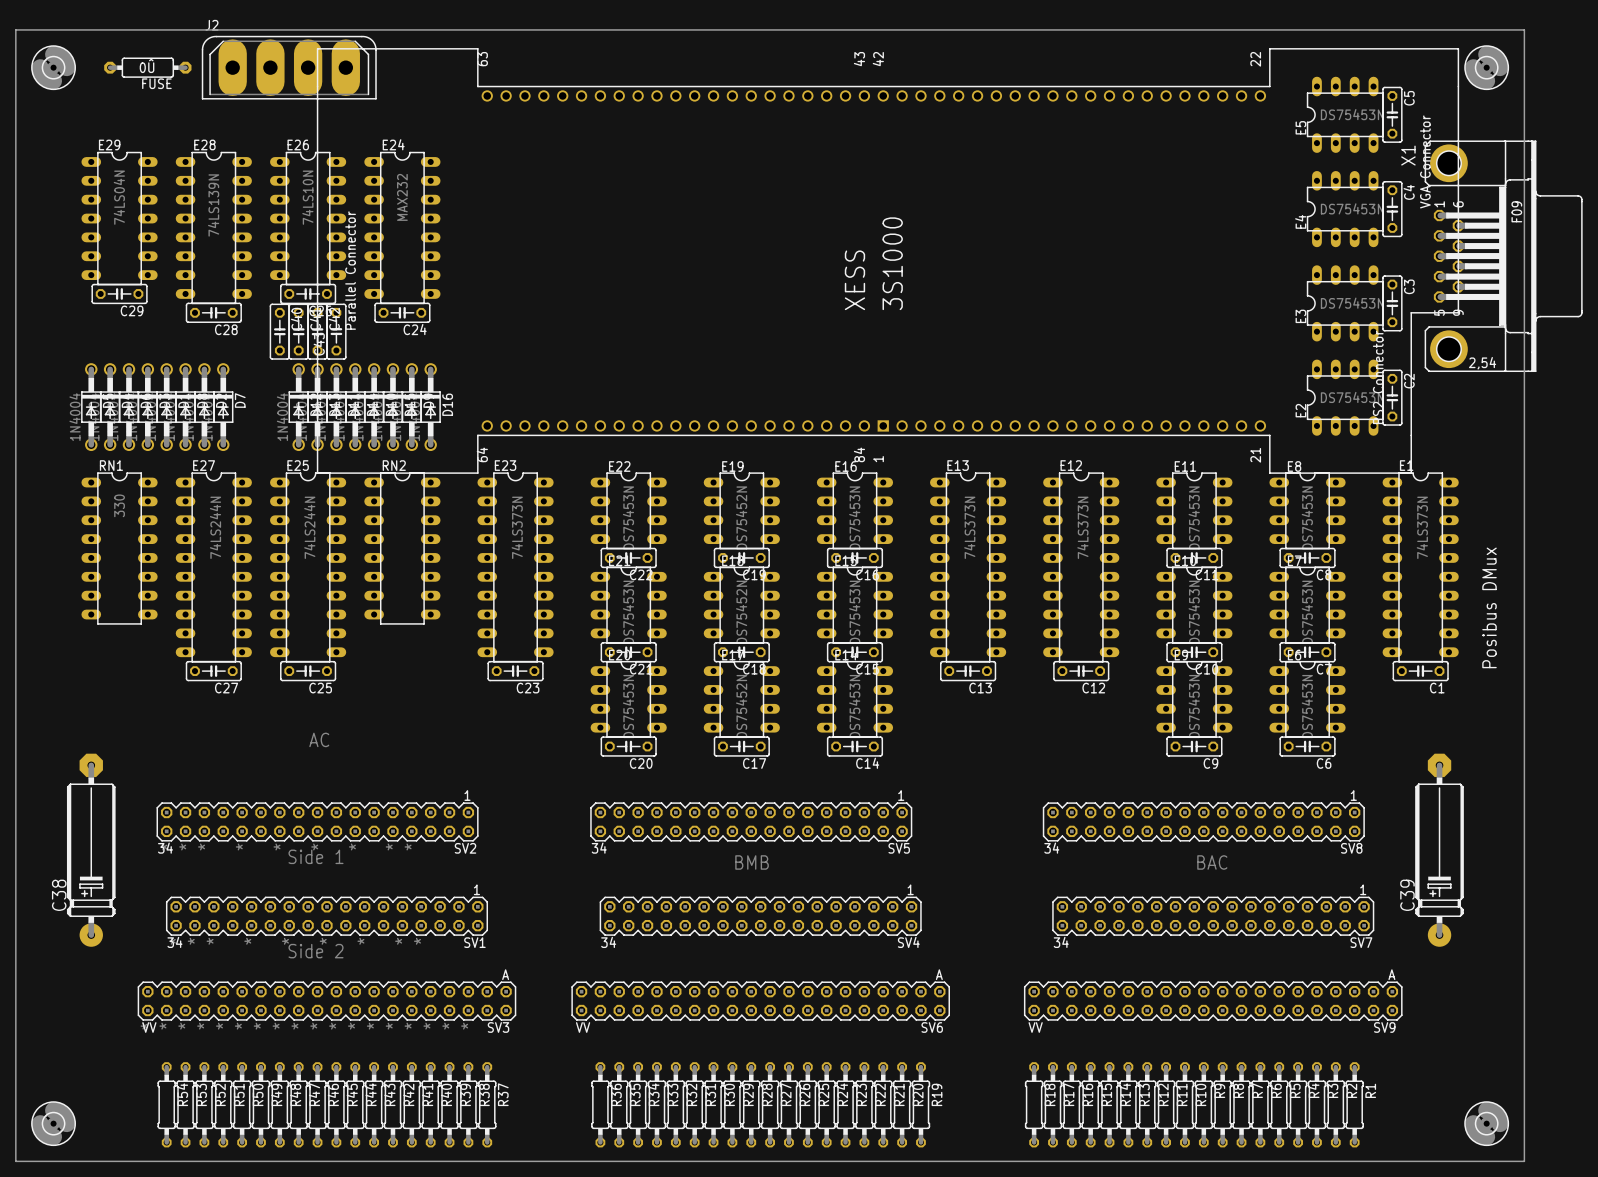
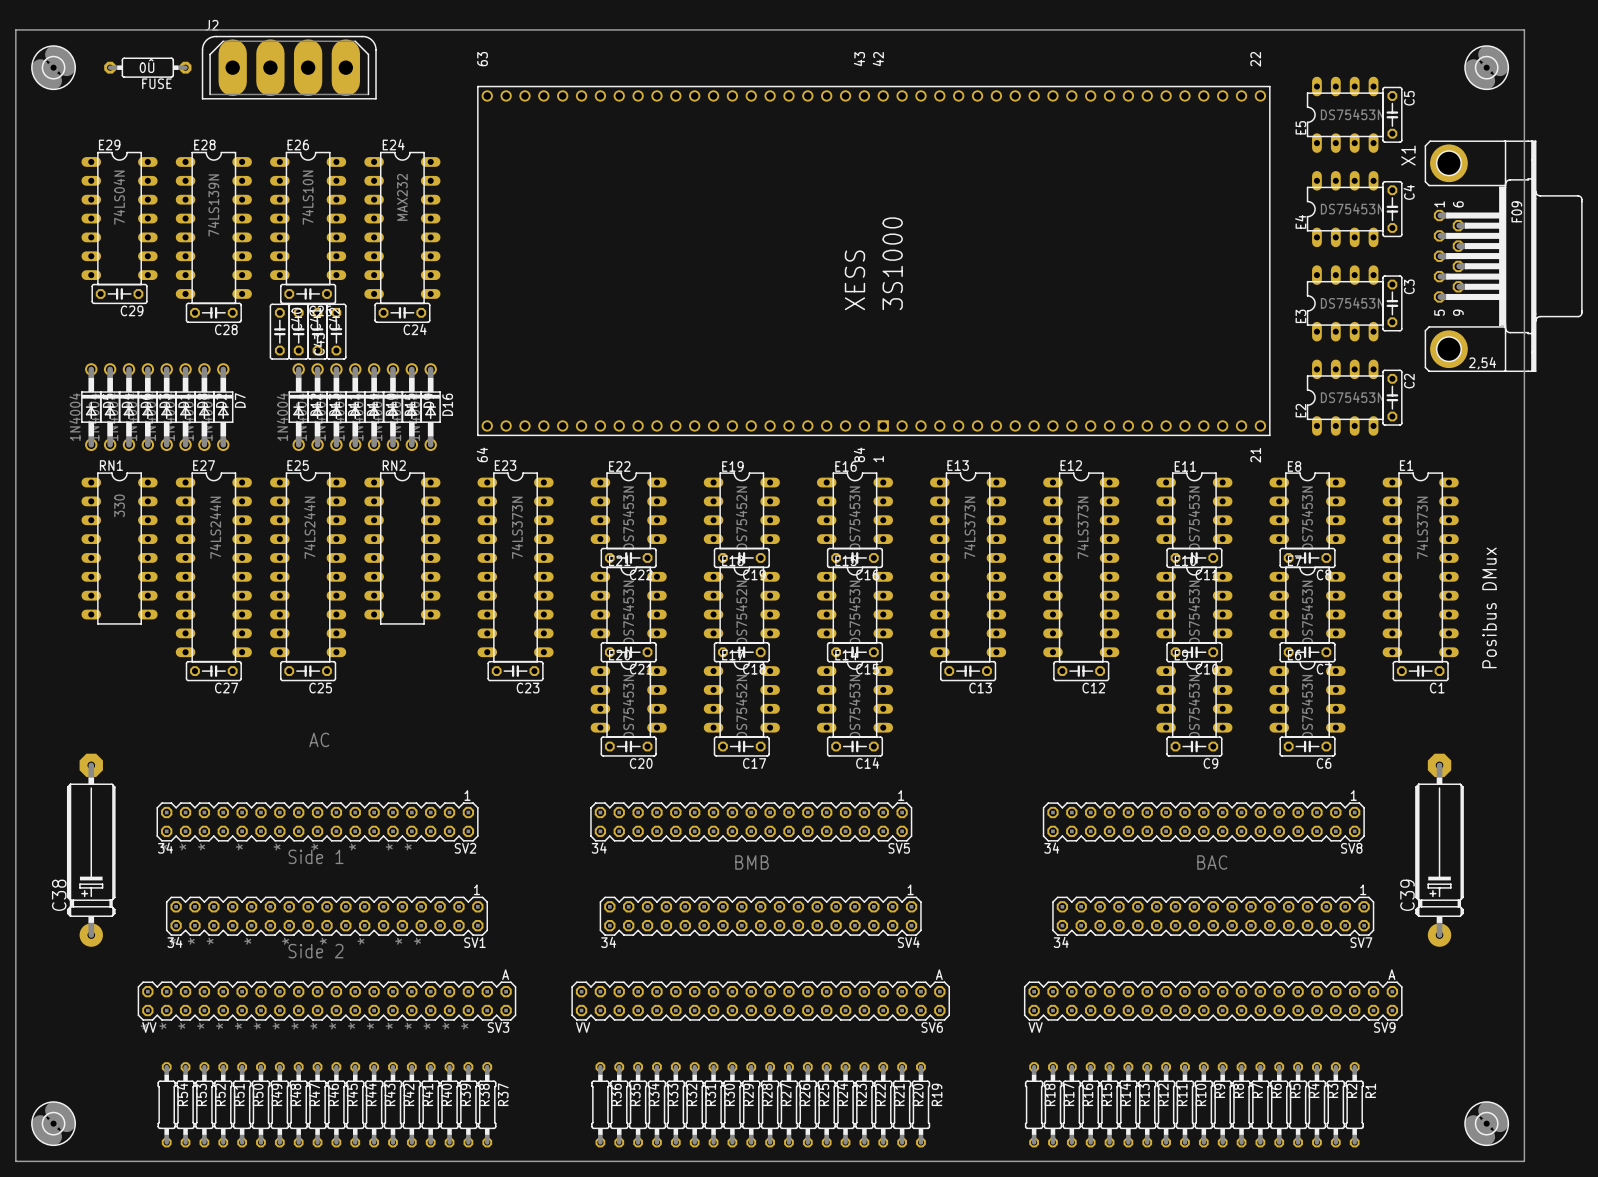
XESS: none -> 3S1000 (873, 260)
XESS: 3S1000 (887, 260) -> none

